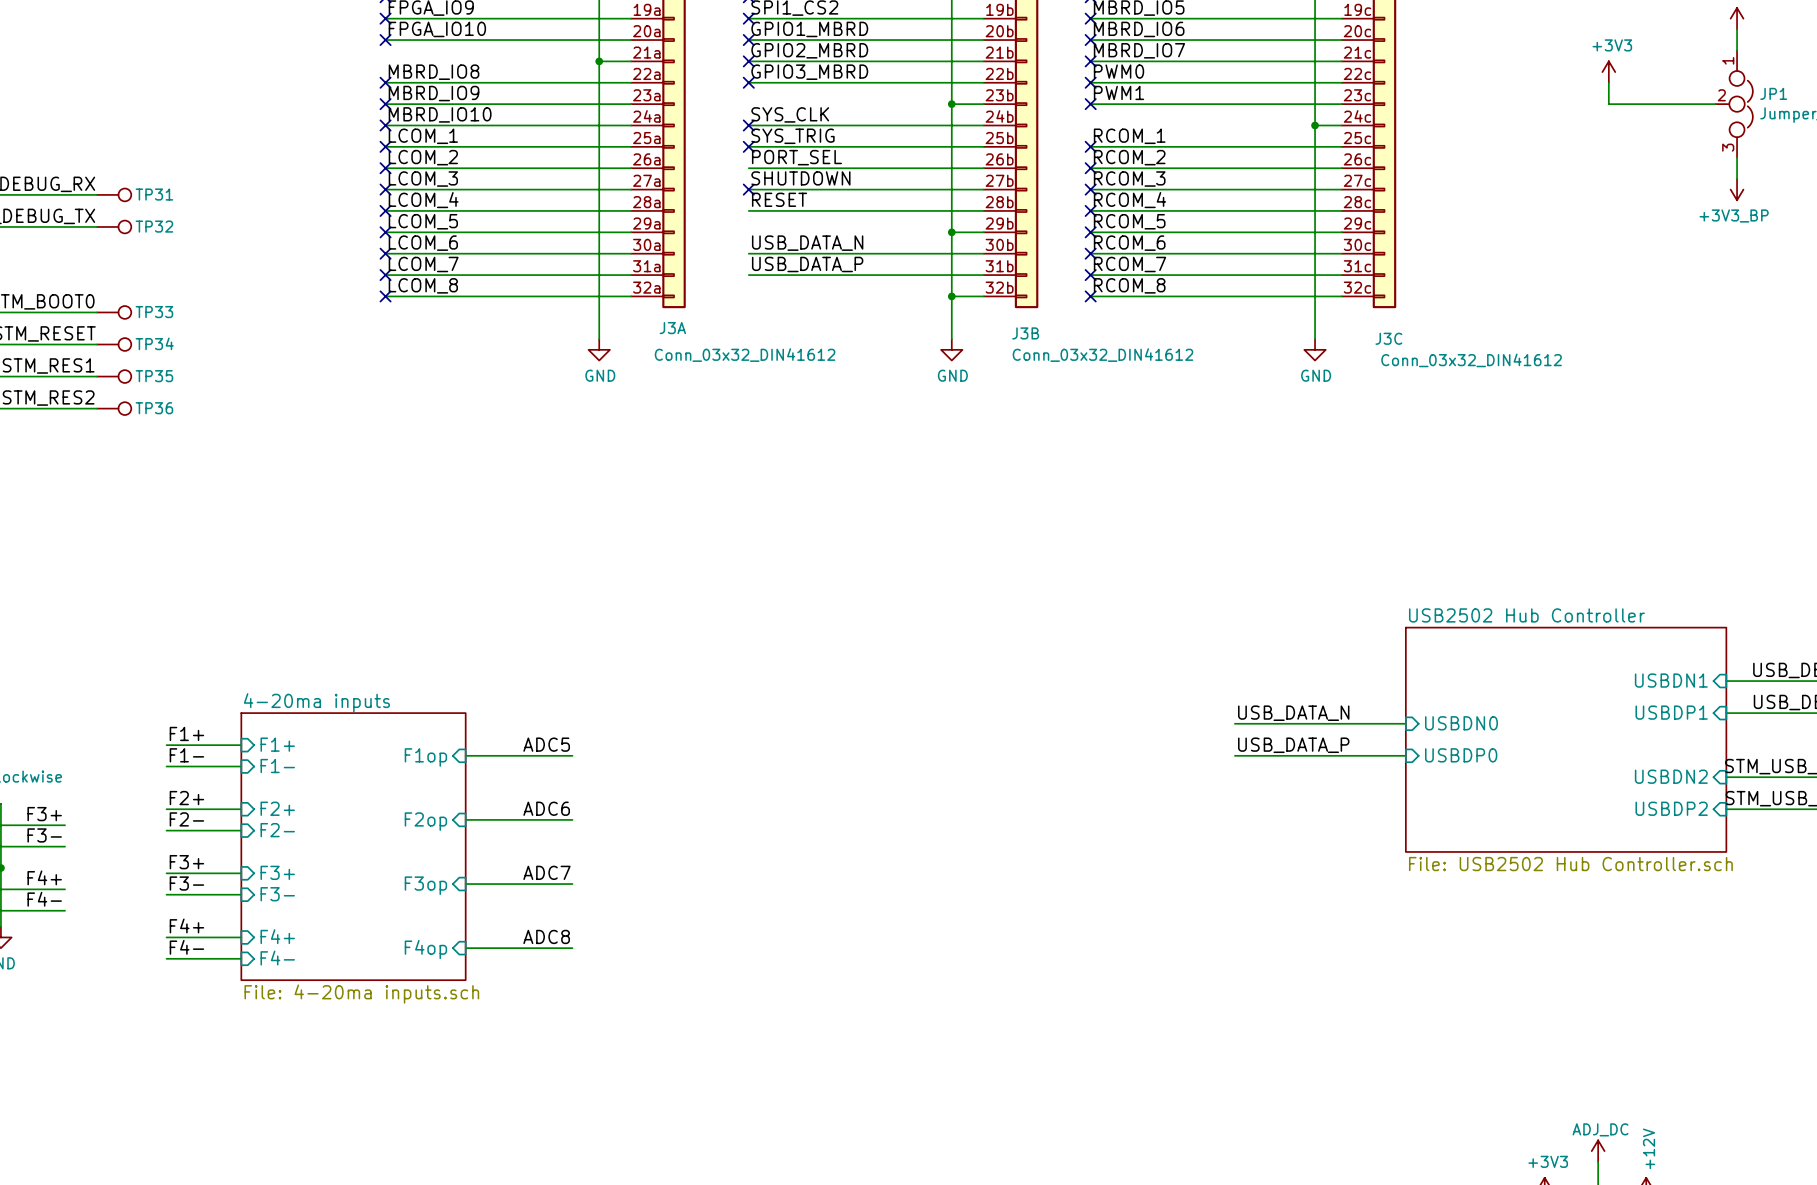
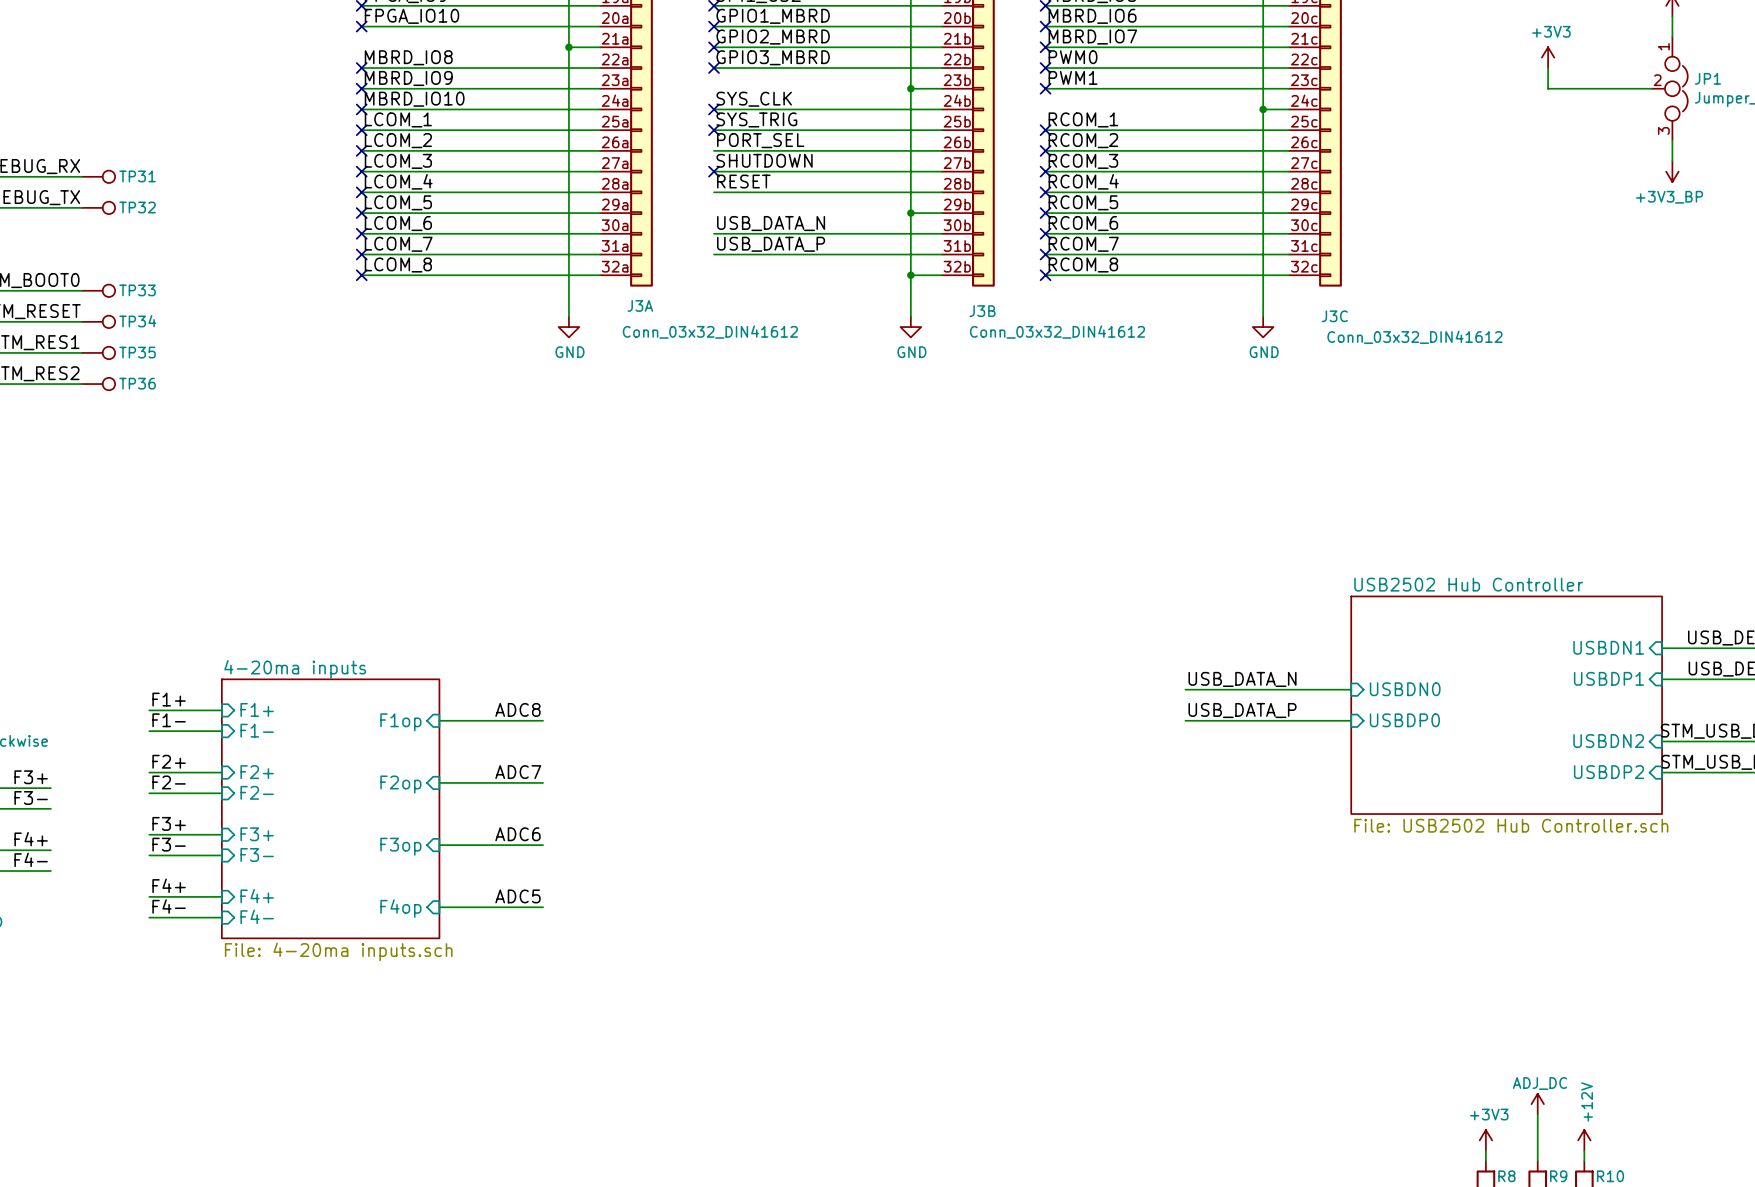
label: ADC5 (546, 744) -> ADC8 (517, 709)
label: ADC6 (546, 808) -> ADC7 (518, 772)
label: ADC7 (546, 872) -> ADC6 (517, 834)
label: ADC8 (546, 936) -> ADC5 (517, 896)

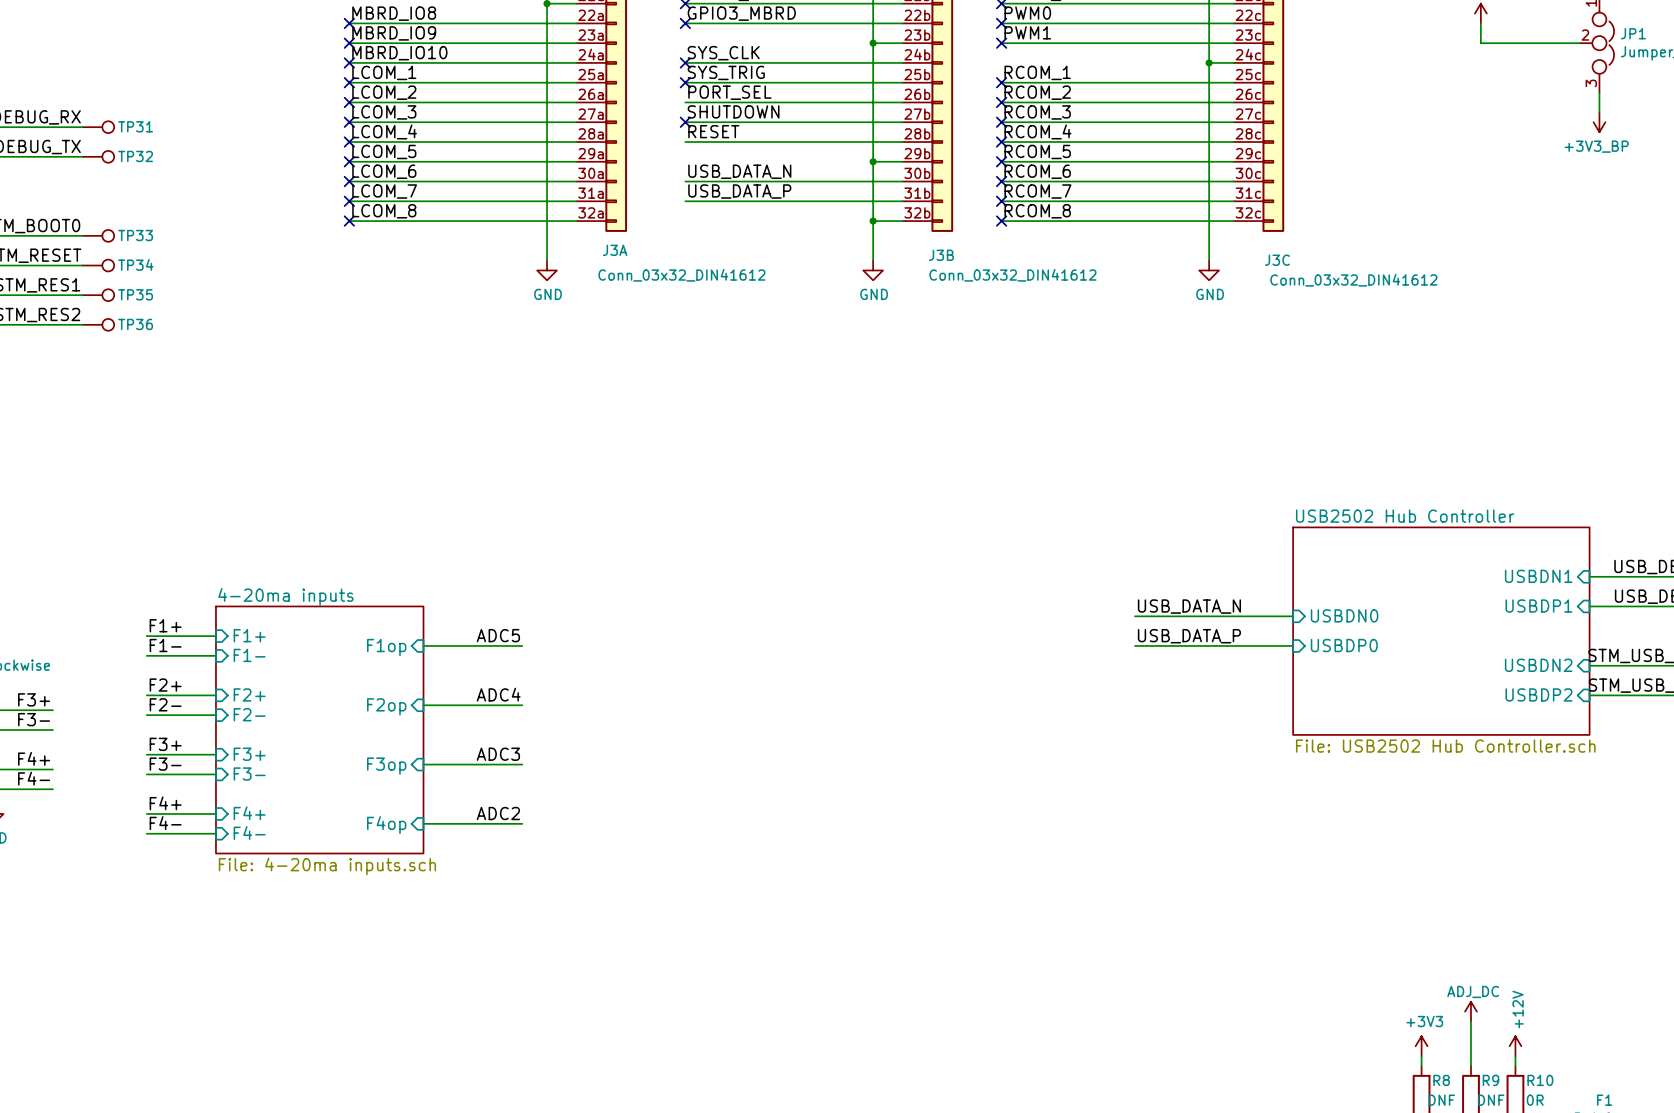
label: ADC8 (517, 709) -> ADC5 (498, 635)
label: ADC7 (518, 772) -> ADC4 (498, 694)
label: ADC6 (517, 834) -> ADC3 (498, 754)
label: ADC5 (517, 896) -> ADC2 (498, 813)

